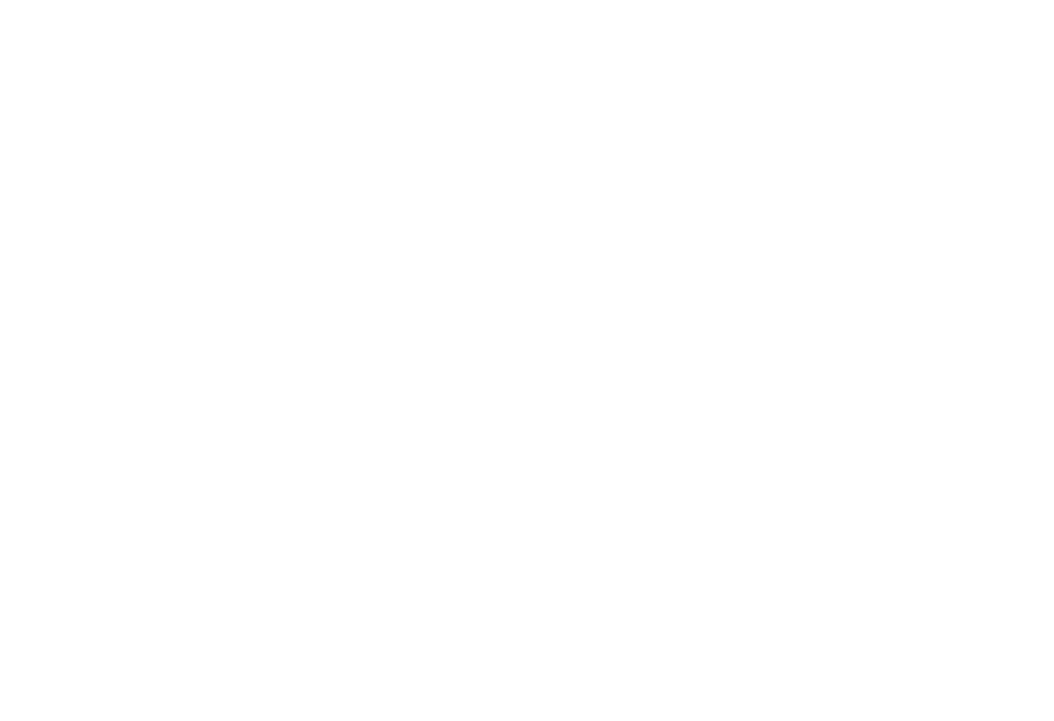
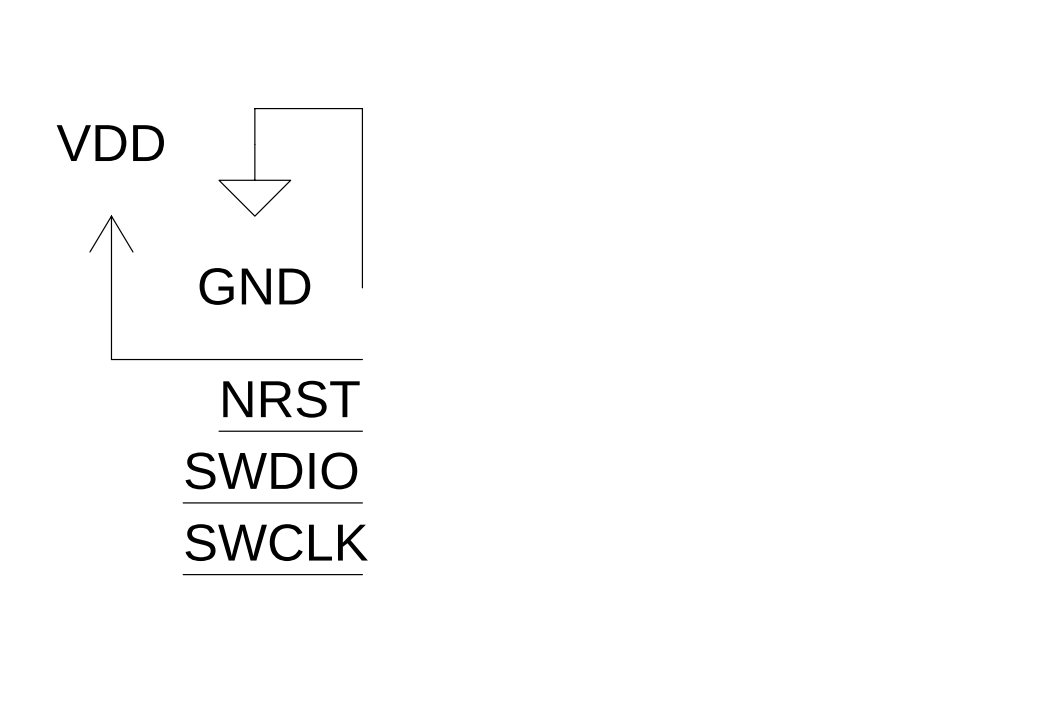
wire: none -> (254, 144) (254, 108) (362, 108) (362, 287)
power symbol: none -> GND (254, 180)
power symbol: none -> VDD (111, 251)
wire: none -> (111, 287) (111, 359) (362, 359)
label: none -> NRST (291, 399)
wire: none -> (219, 431) (362, 431)
label: none -> SWDIO (271, 470)
wire: none -> (183, 502) (362, 502)
label: none -> SWCLK (276, 542)
wire: none -> (183, 574) (362, 574)

